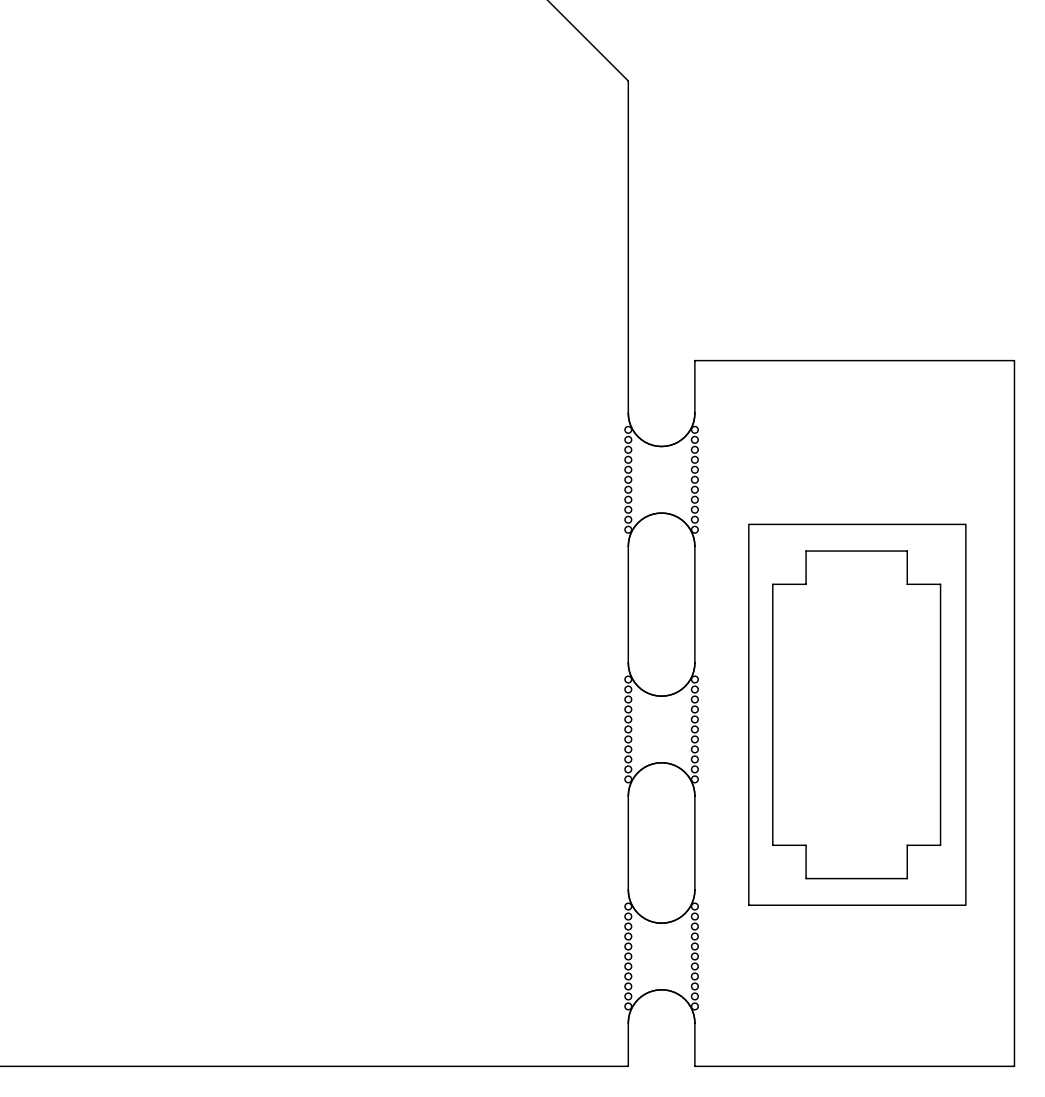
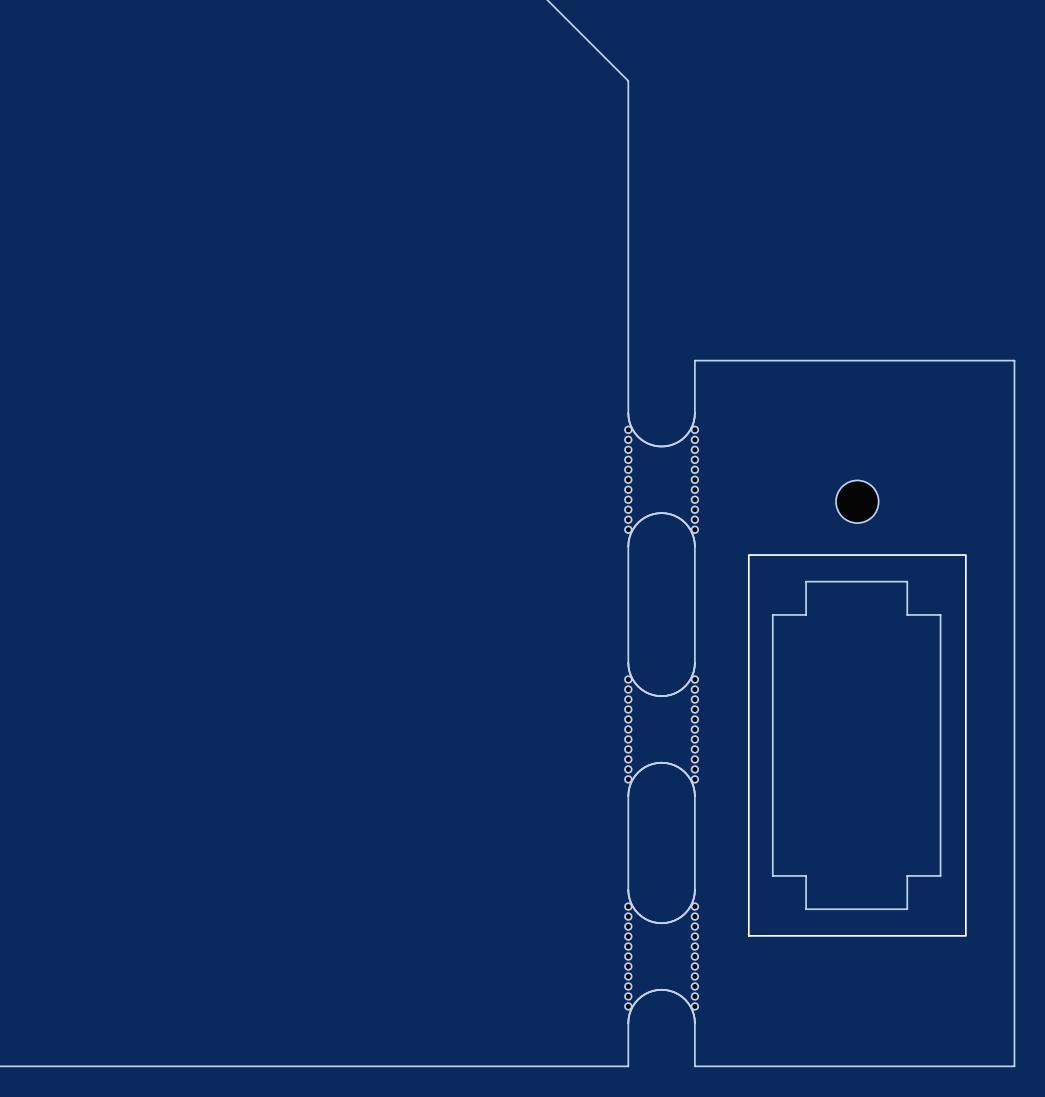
part: none -> (857, 501)
drawing position: (857, 714) -> (857, 745)

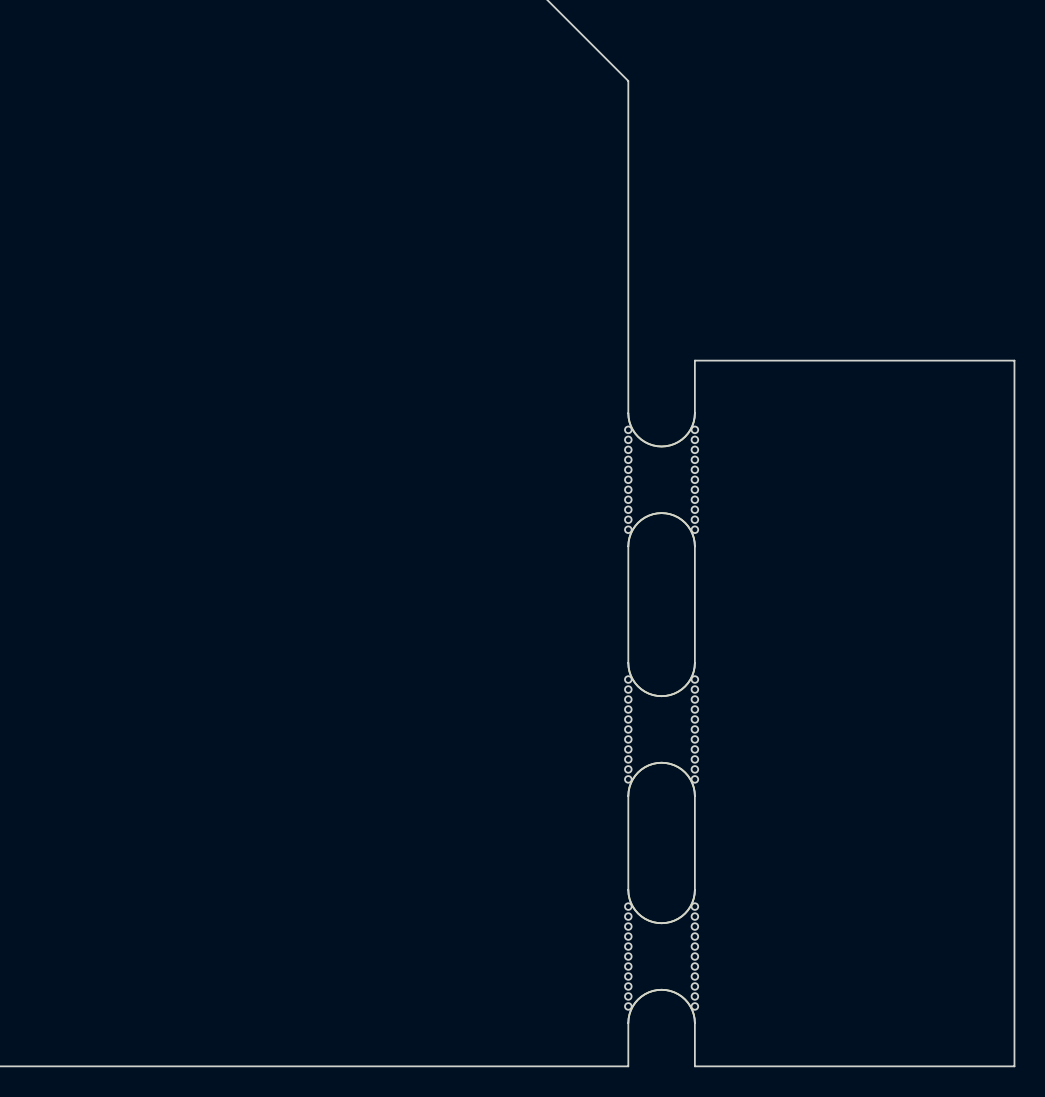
part: (857, 501) -> none
drawing: [748, 554, 967, 937] -> none

